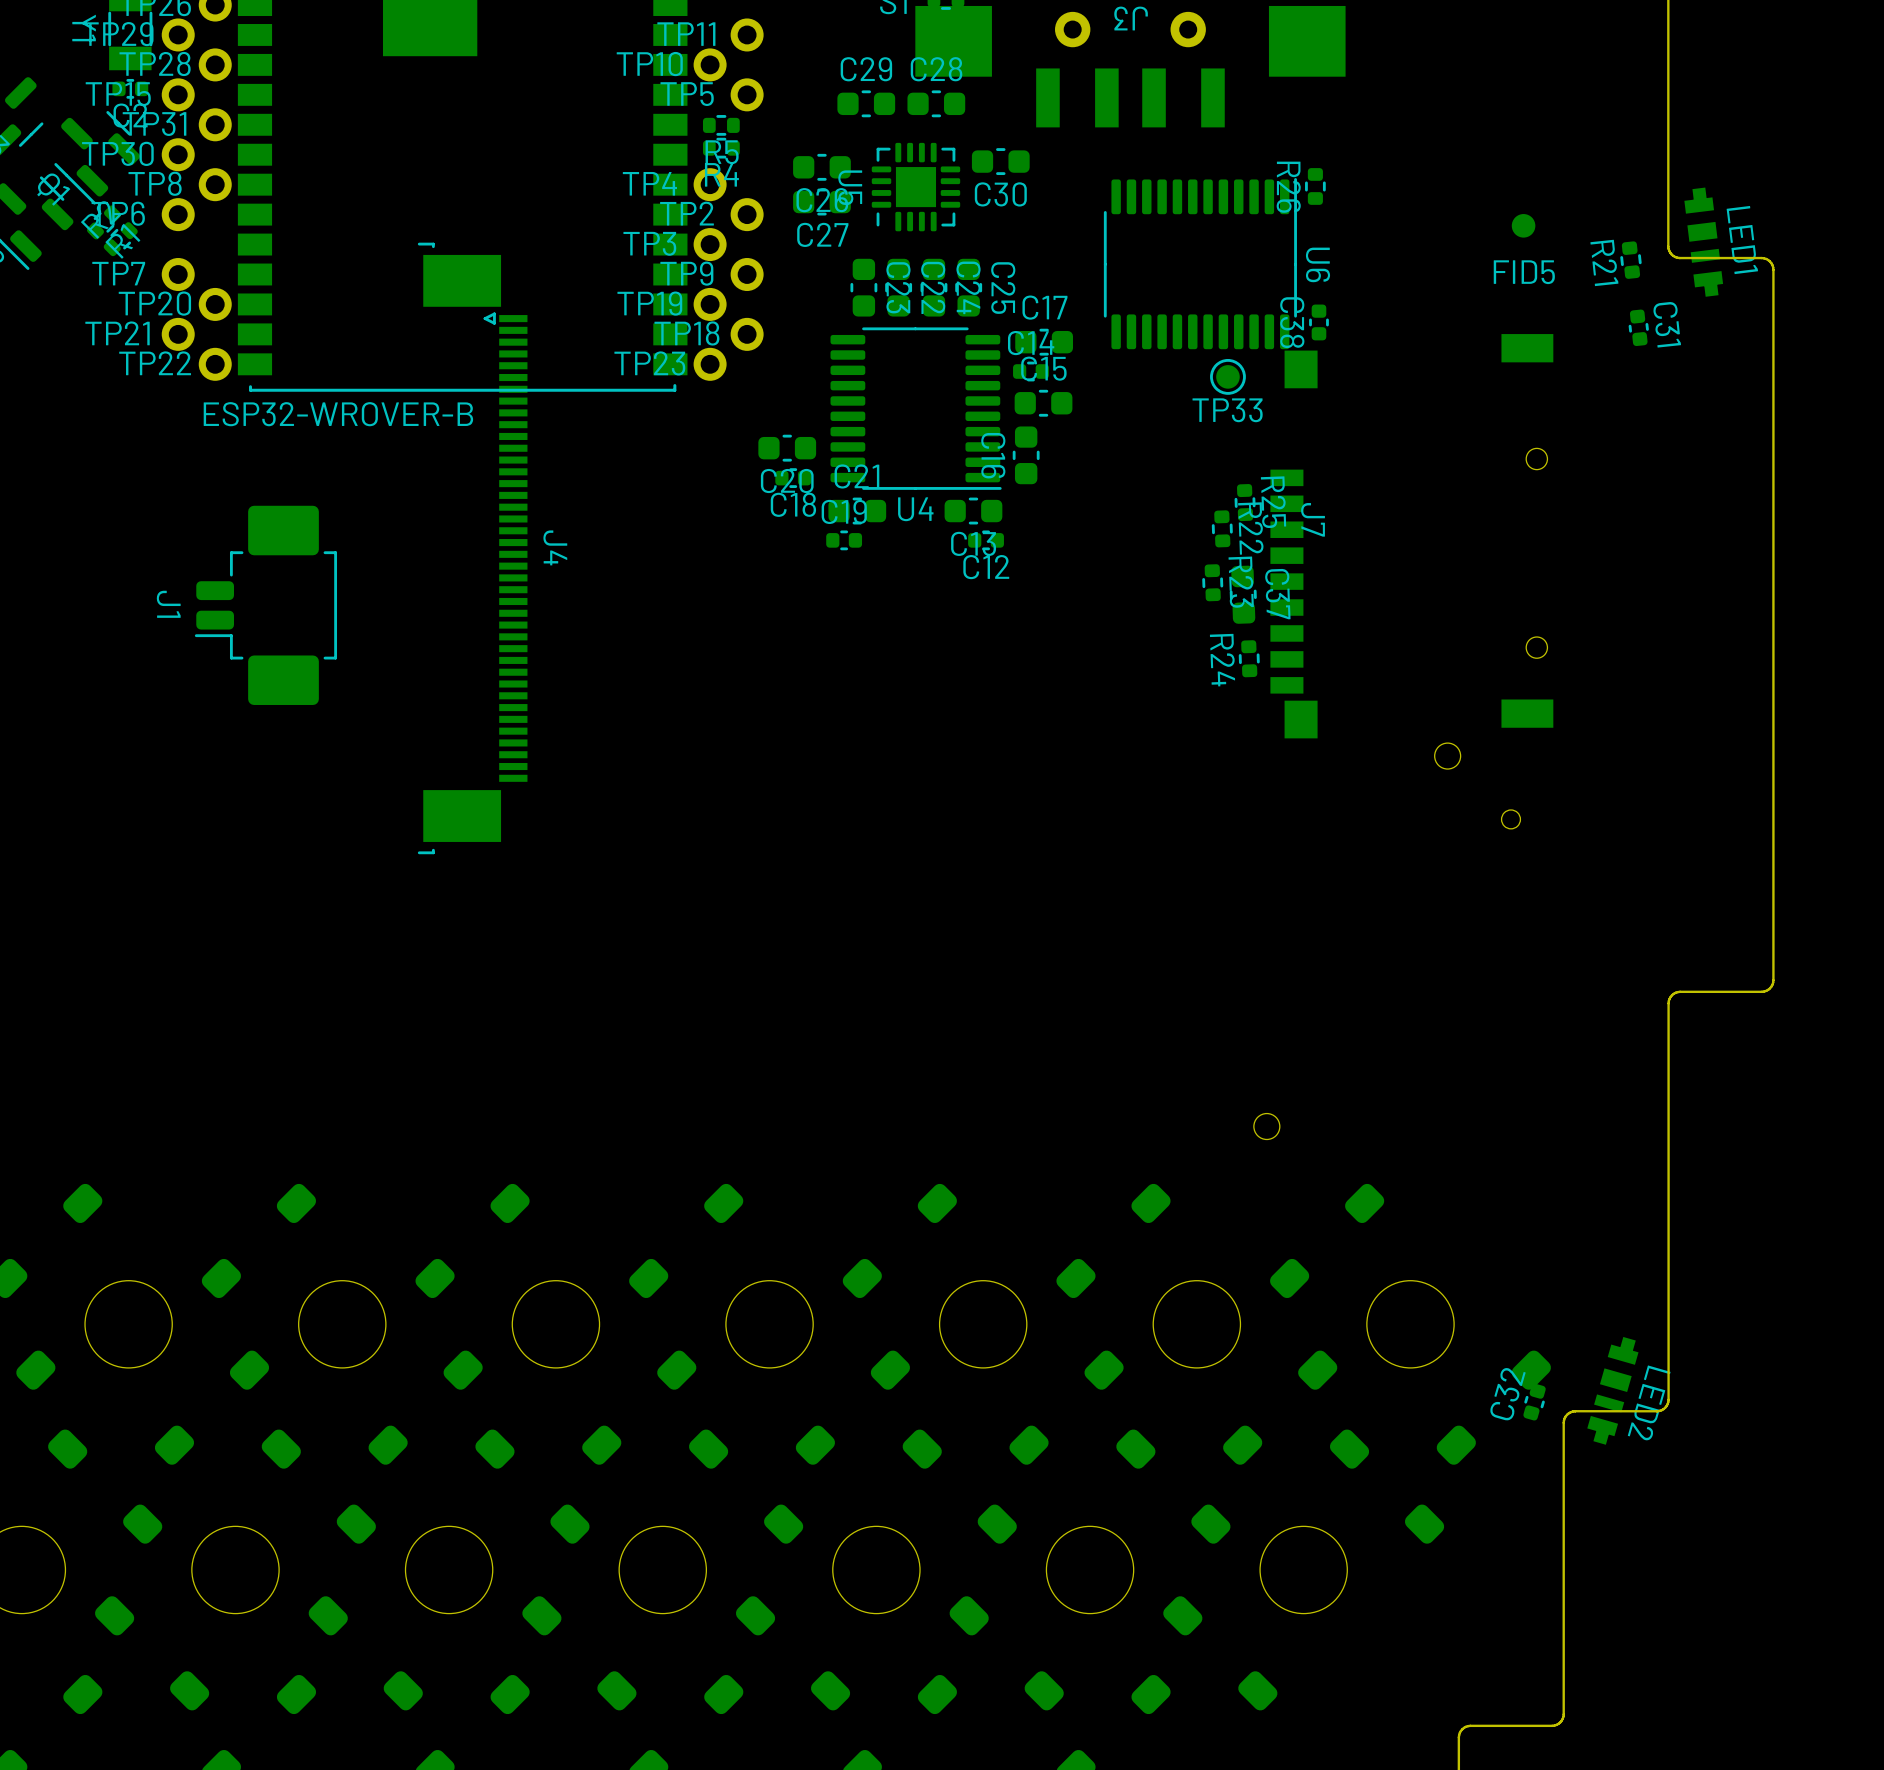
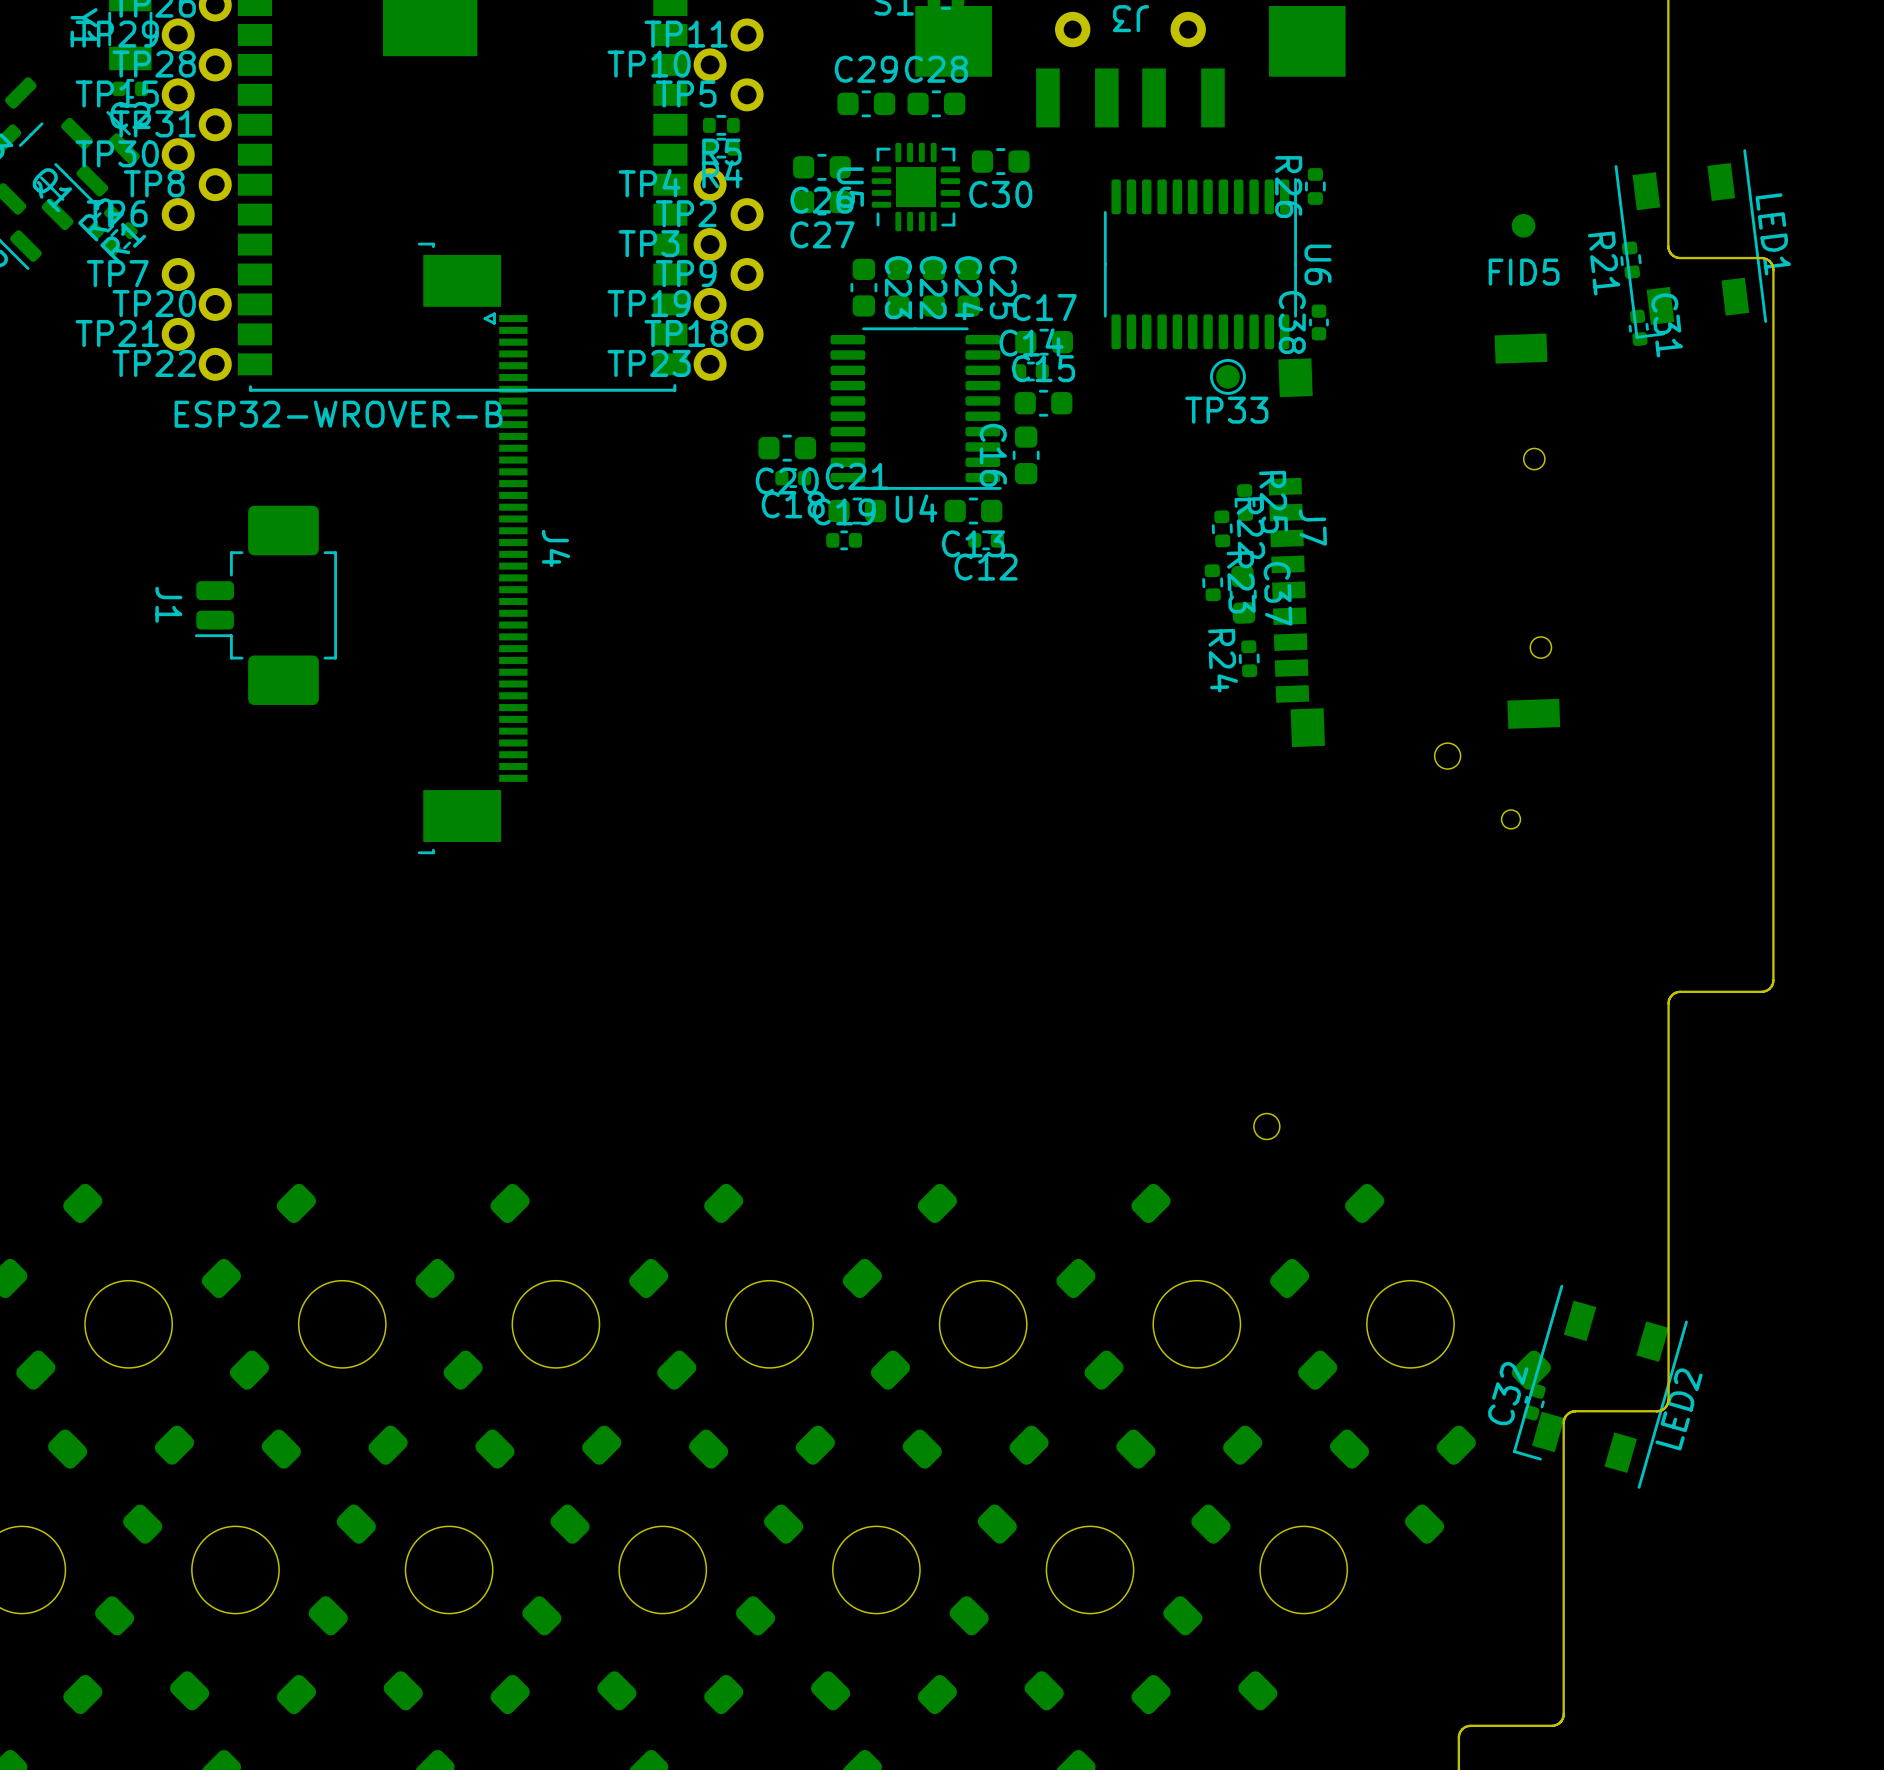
LED1 footprint: [1684, 187, 1724, 297] -> [1614, 149, 1768, 339]
J7 rotation: 0° (1411, 536) -> 2° counterclockwise (1414, 540)
LED2 footprint: [1587, 1336, 1639, 1445] -> [1512, 1284, 1688, 1489]

